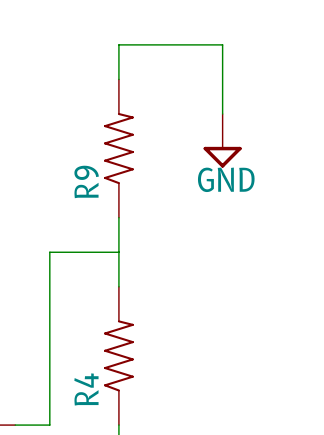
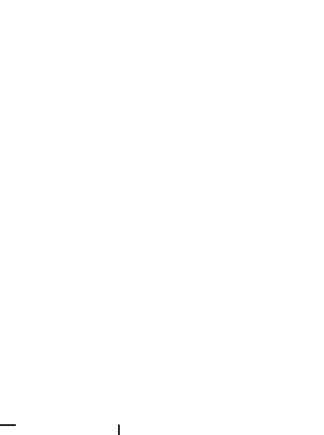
wire: (118, 79) (118, 44) (222, 44) (222, 114) -> none
power symbol: GND (222, 140) -> none
R9: (118, 148) -> none
wire: (118, 217) (118, 286) -> none
wire: (118, 252) (49, 252) (49, 425) (15, 425) -> none
R4: (118, 355) -> none

